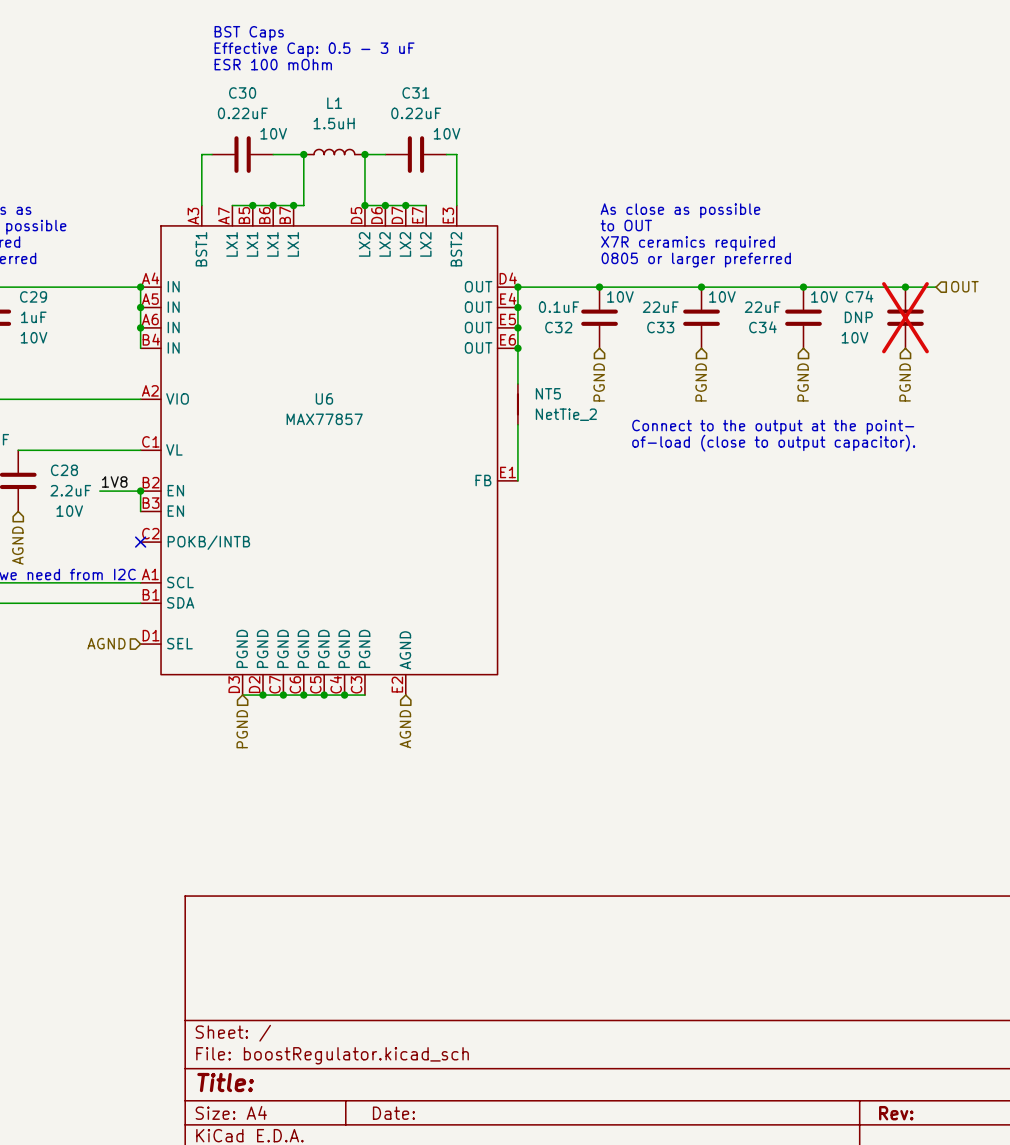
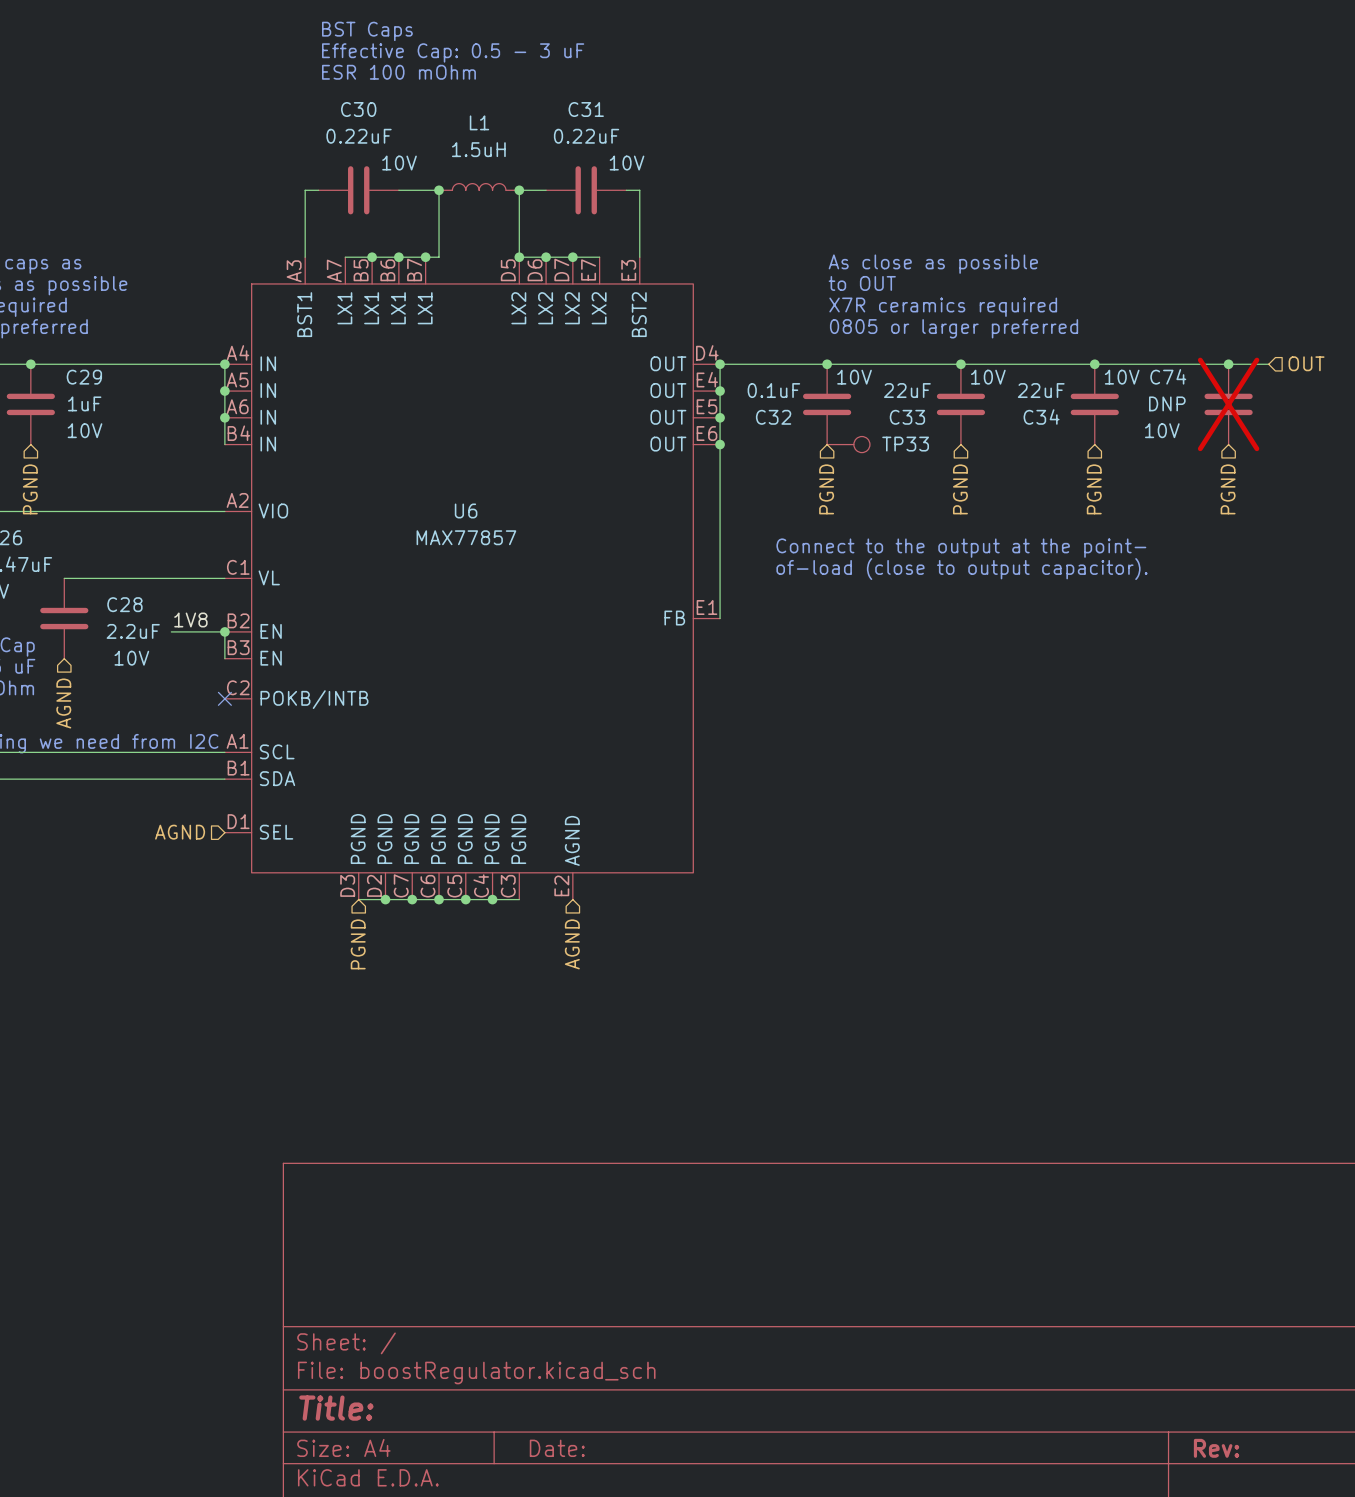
TP33: none -> (848, 444)
NT5: NetTie_2 (517, 404) -> none
text position: Connect to the output at the point- (773, 427) -> Connect to the output at the point- (961, 548)
text position: of-load (close to output capacitor). (773, 443) -> of-load (close to output capacitor). (962, 569)

